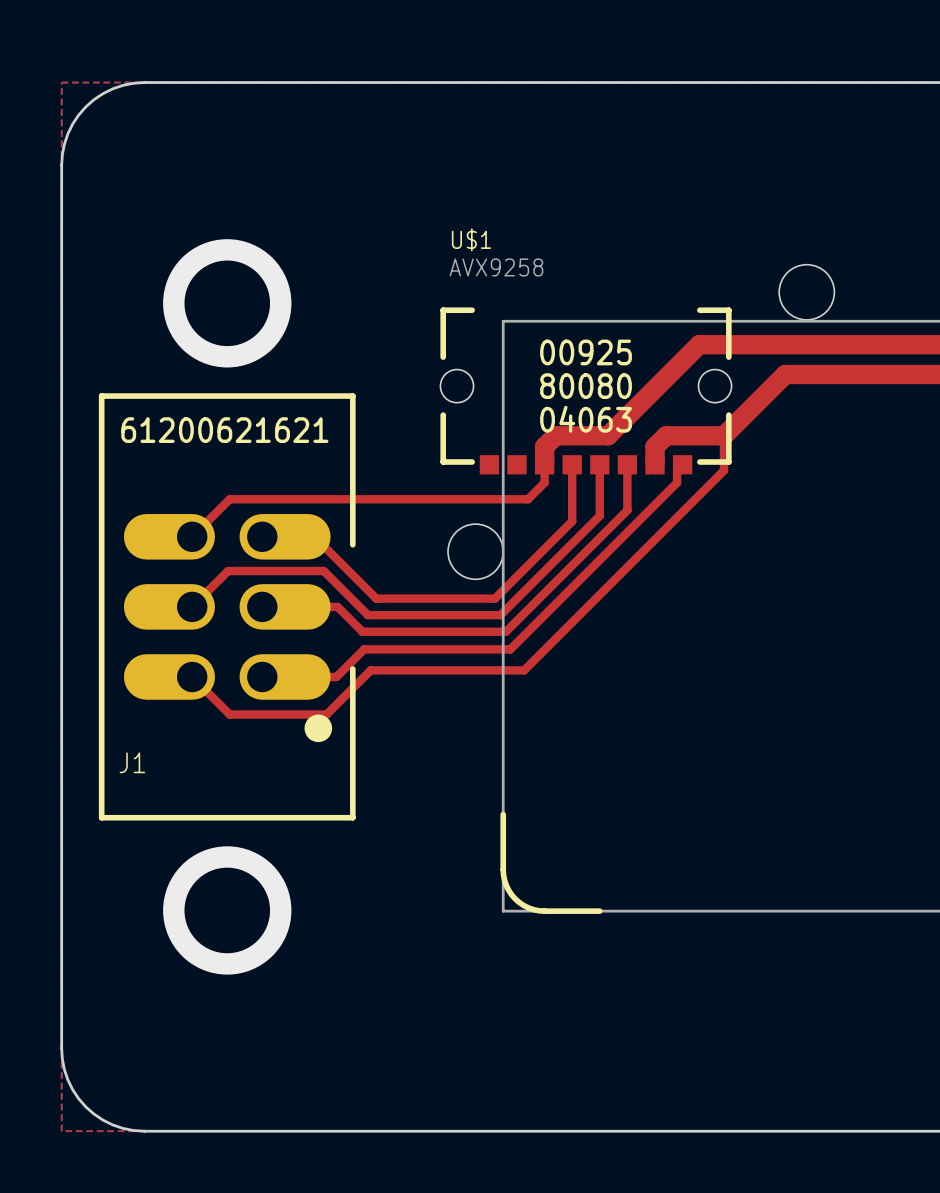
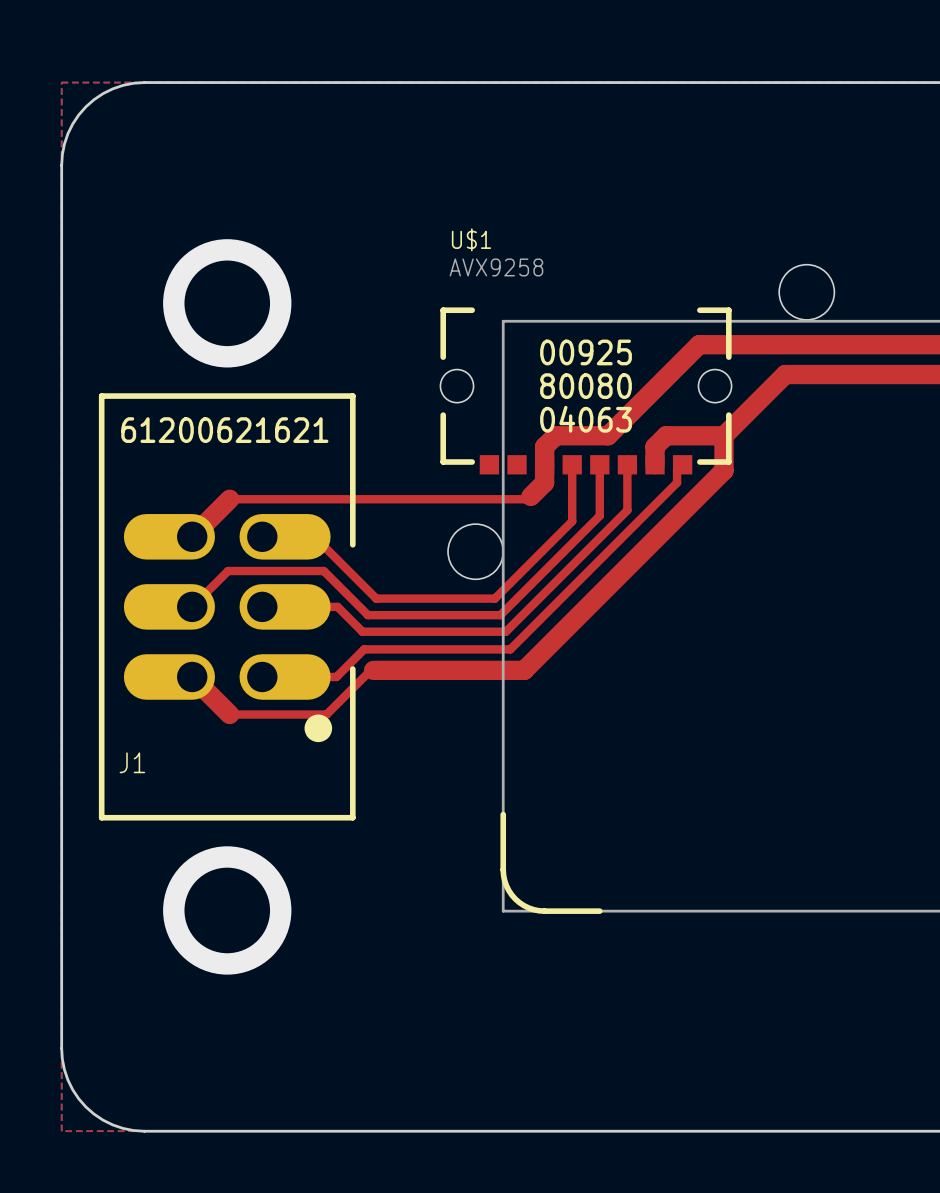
top track width: thin (724, 435) (724, 470) (524, 670) (373, 670) -> thick (724, 435) (724, 470) (524, 670) (373, 670)
top track width: thin (544, 464) (544, 482) (530, 496) -> thick (544, 464) (544, 482) (530, 496)
top track width: thin (229, 499) (192, 536) -> thick (229, 499) (192, 536)
top track width: thin (192, 676) (229, 714) -> thick (192, 676) (229, 714)

